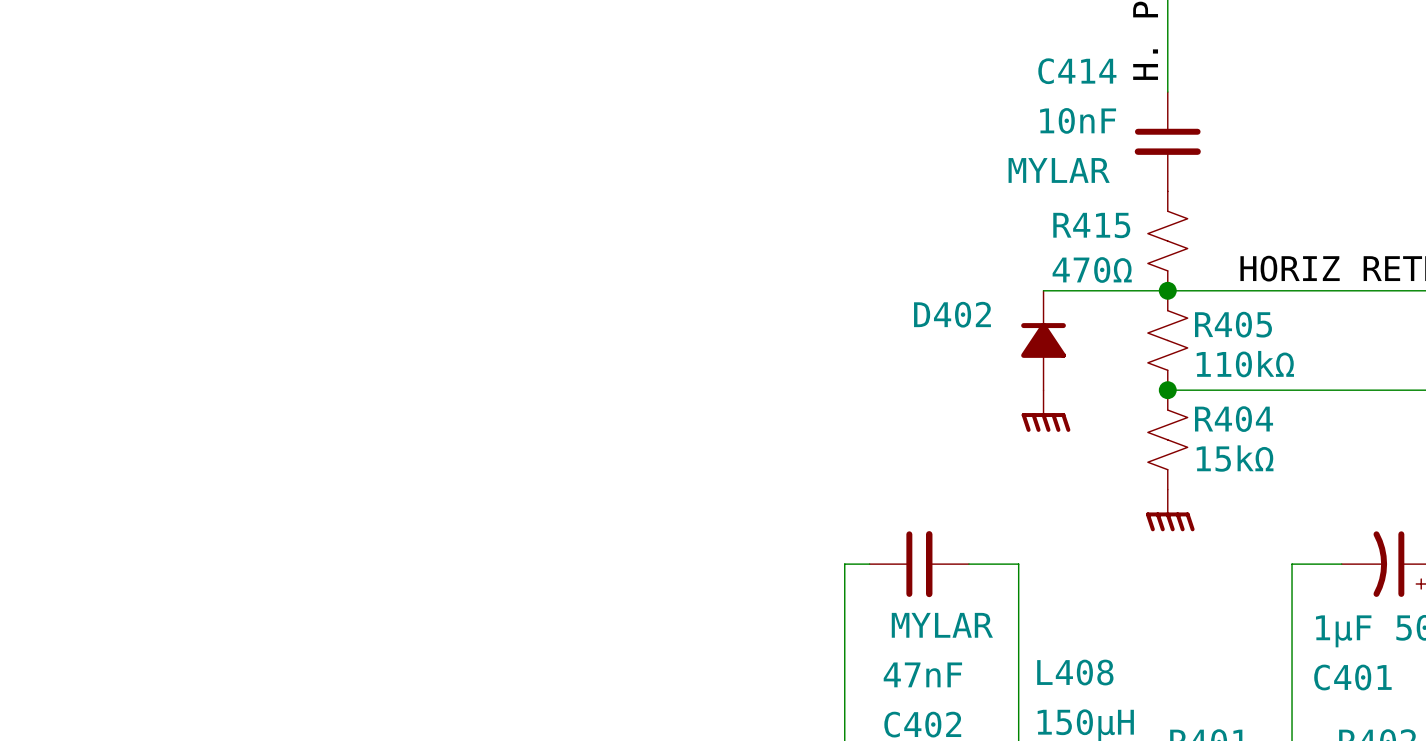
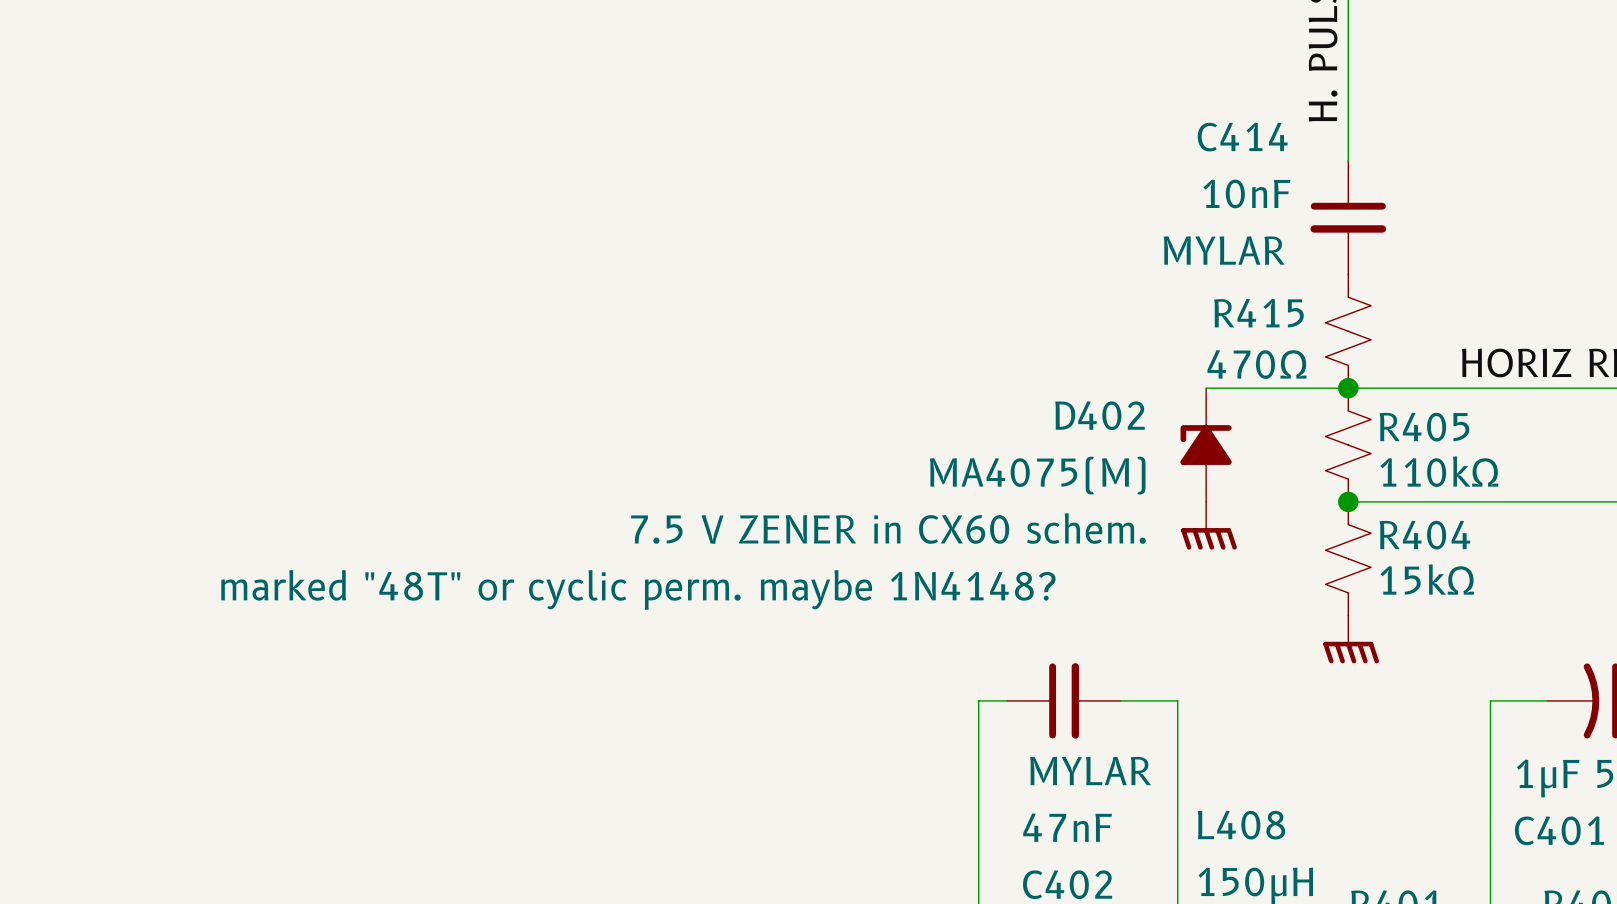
D402 symbol: [1021, 290, 1066, 391] -> [1180, 388, 1232, 502]
D402 value: none -> MA4075(M) (1037, 475)
D402 text: none -> 7.5 V ZENER in CX60 schem. (888, 528)
D402 text: none -> marked "48T" or cyclic perm. maybe 1N4148? (638, 589)

